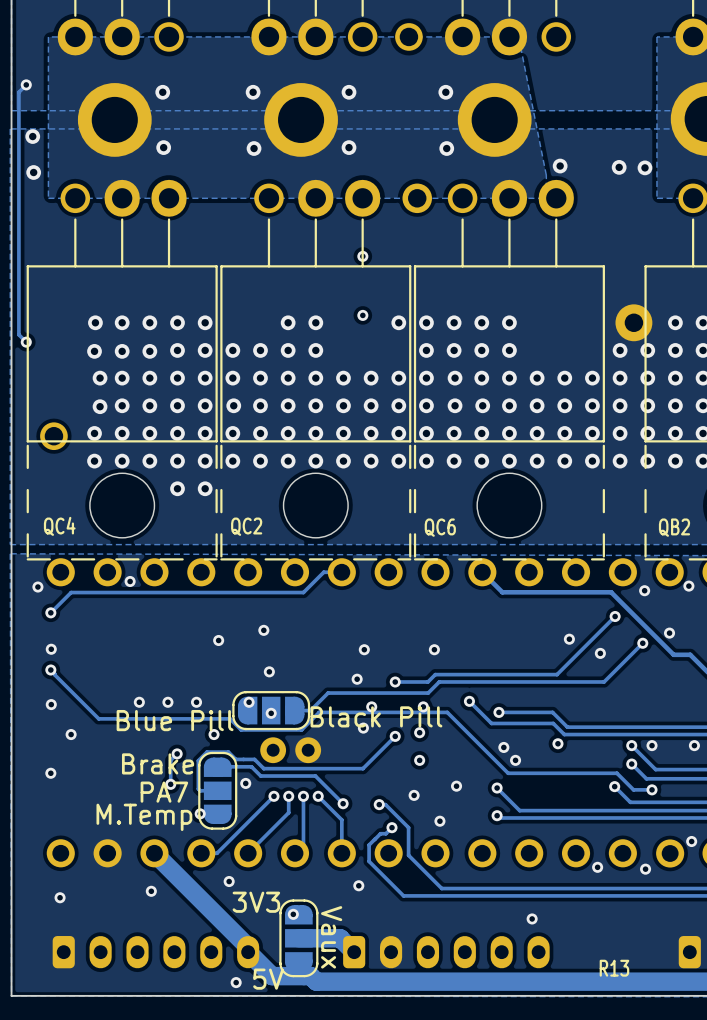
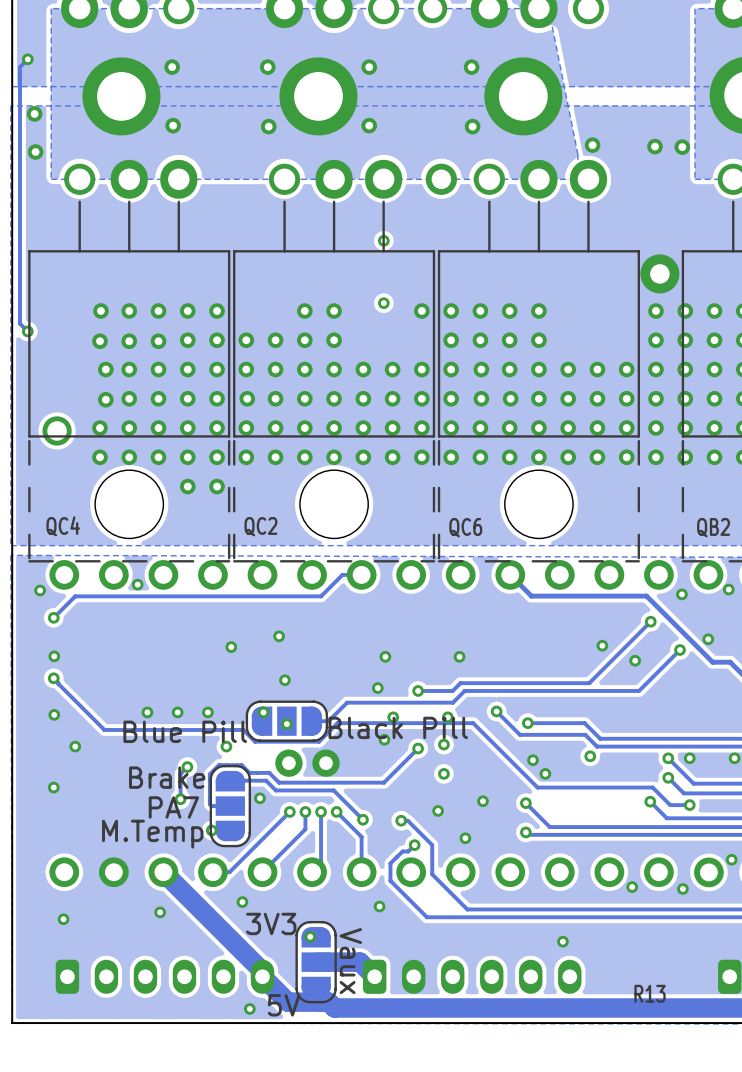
via: none -> (655, 310)
part position: (633, 322) -> (659, 273)
via: none -> (685, 310)

